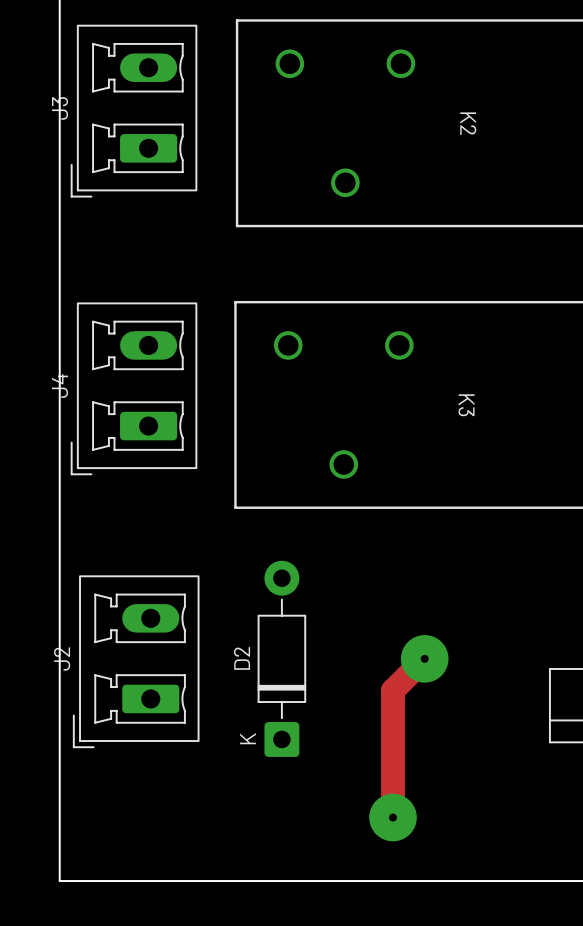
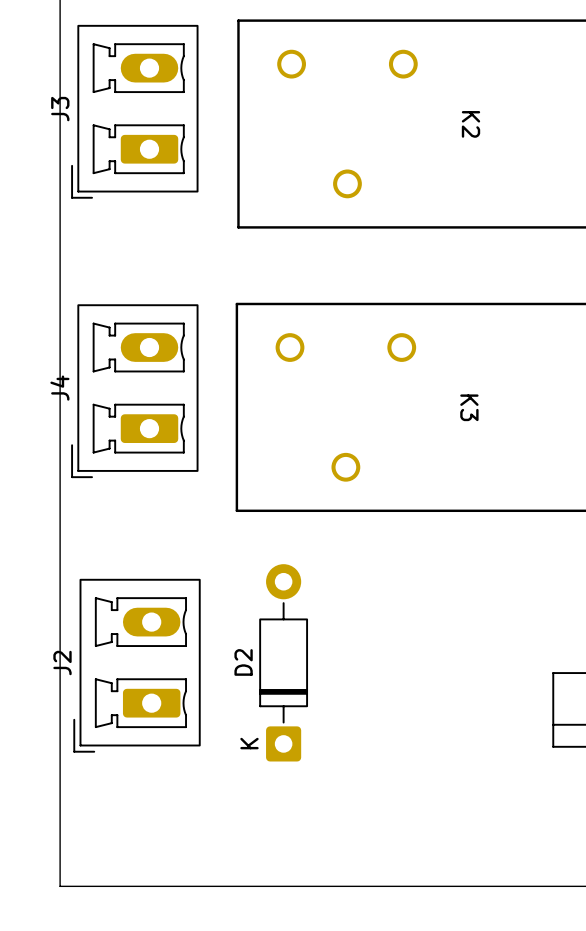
track: (424, 658) (392, 690) (392, 817) -> none
via: (424, 658) -> none
via: (392, 817) -> none

